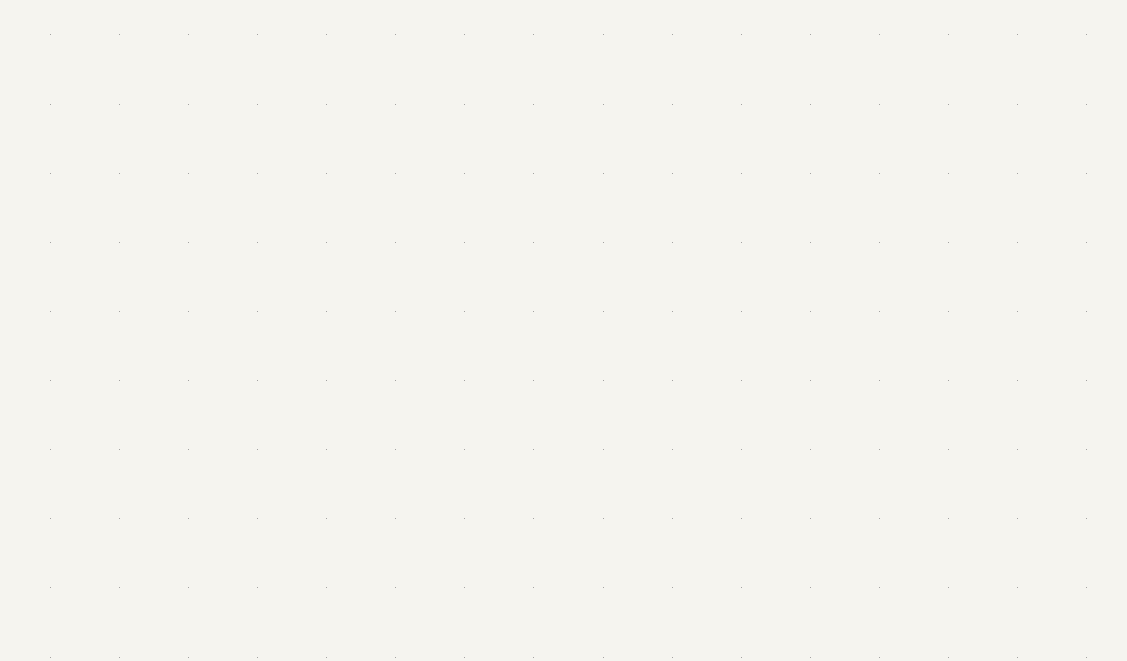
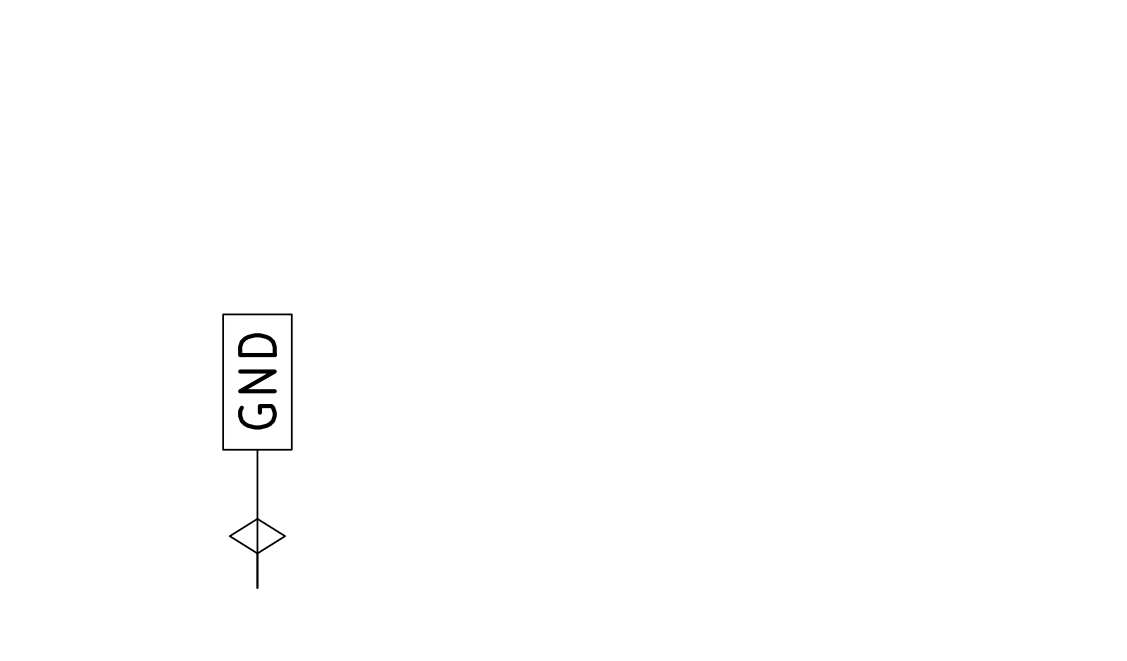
global label: none -> GND (257, 381)
wire: none -> (257, 449) (257, 587)
power symbol: none -> (257, 553)

